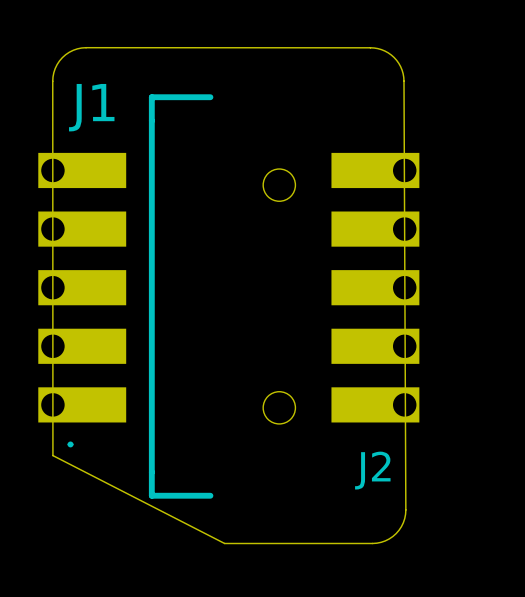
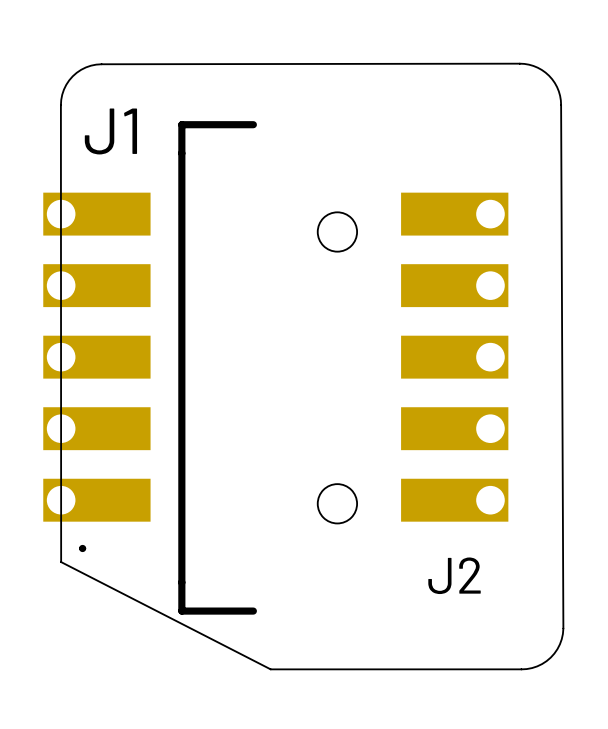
board edge: (86, 47) (374, 48) (391, 55) (398, 63) (403, 73) (405, 509) (403, 522) (392, 536) (376, 543) (224, 543) -> (101, 64) (519, 63) (537, 67) (552, 79) (558, 91) (561, 105) (563, 628)
board edge: none -> (563, 628) (559, 644) (550, 657) (537, 666) (526, 669) (270, 669)

